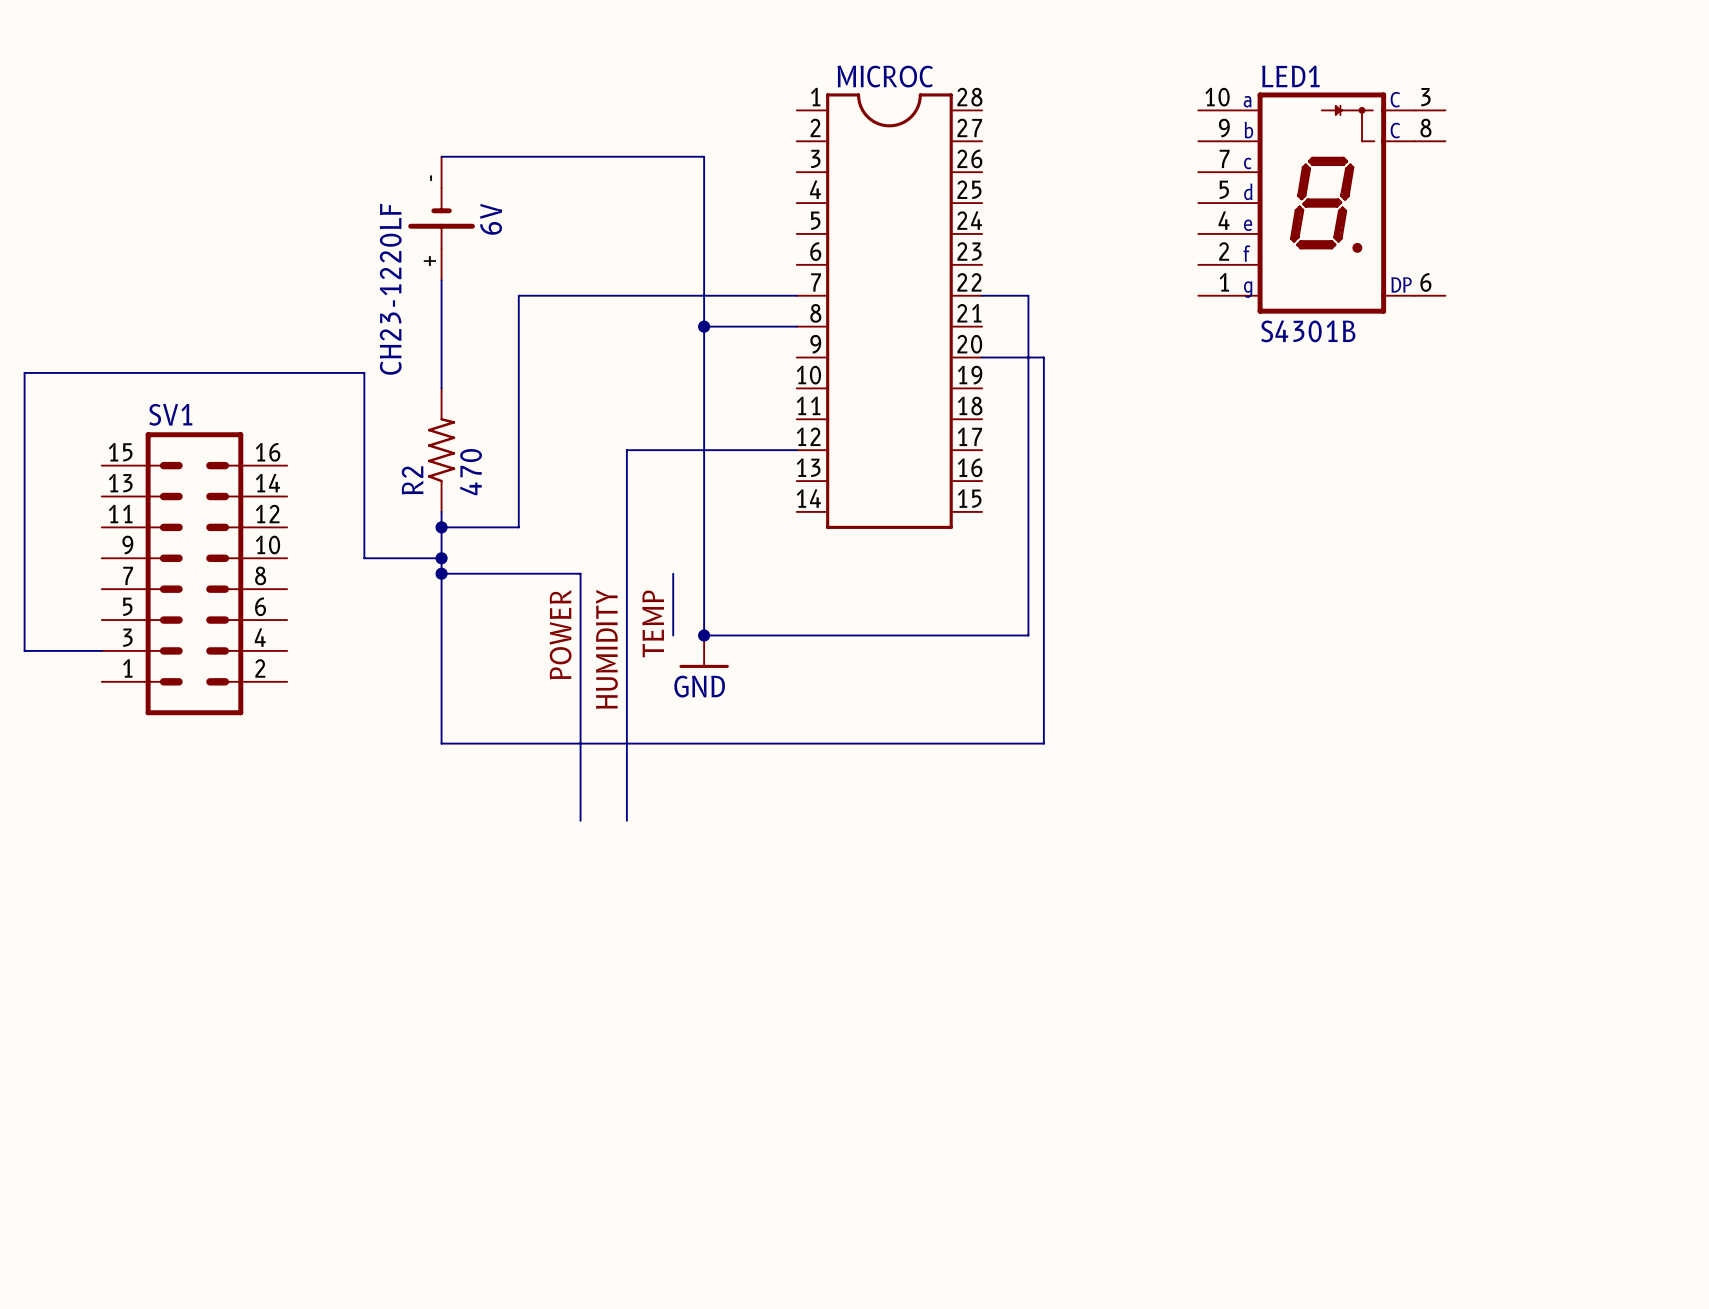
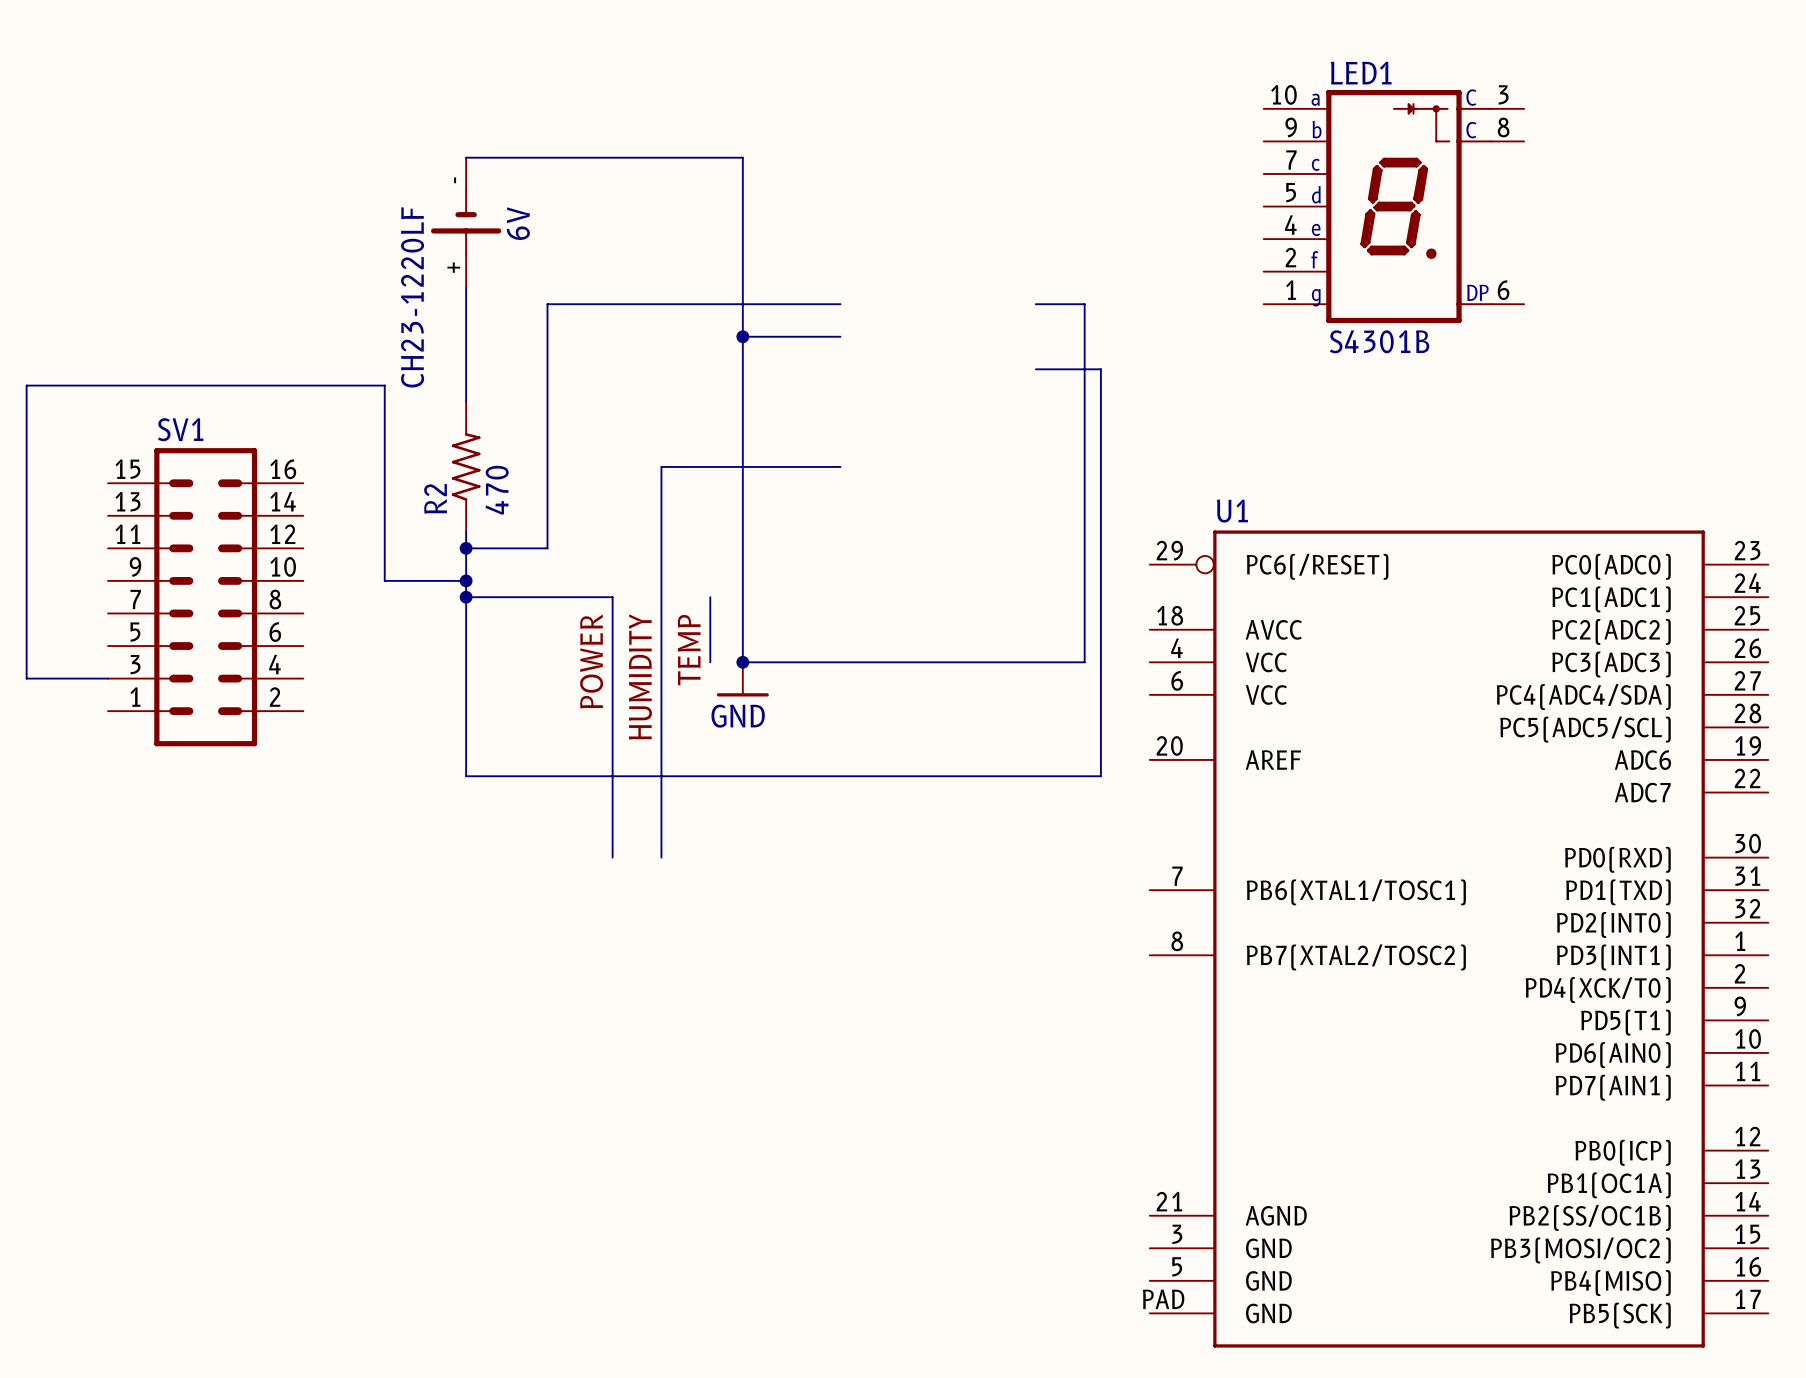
MICROC: (889, 311) -> none
U1: none -> (1459, 939)

